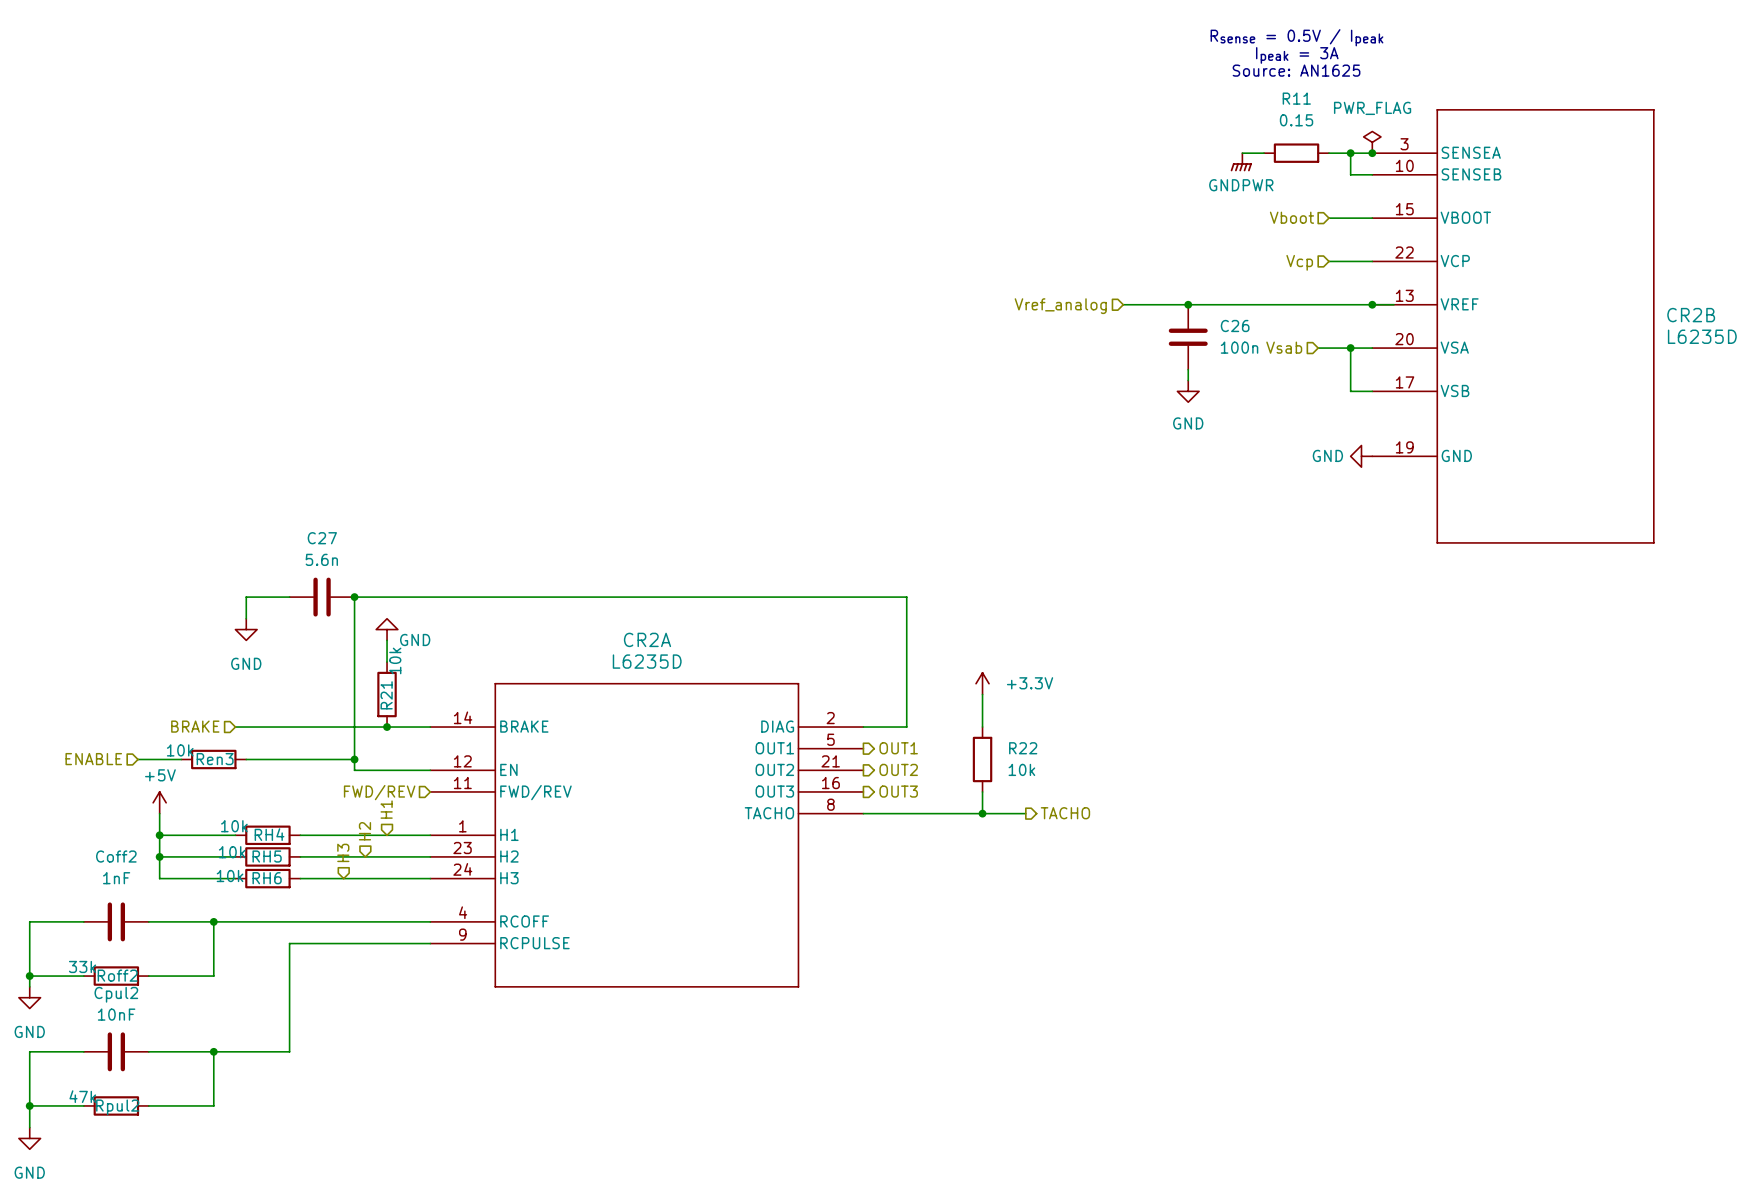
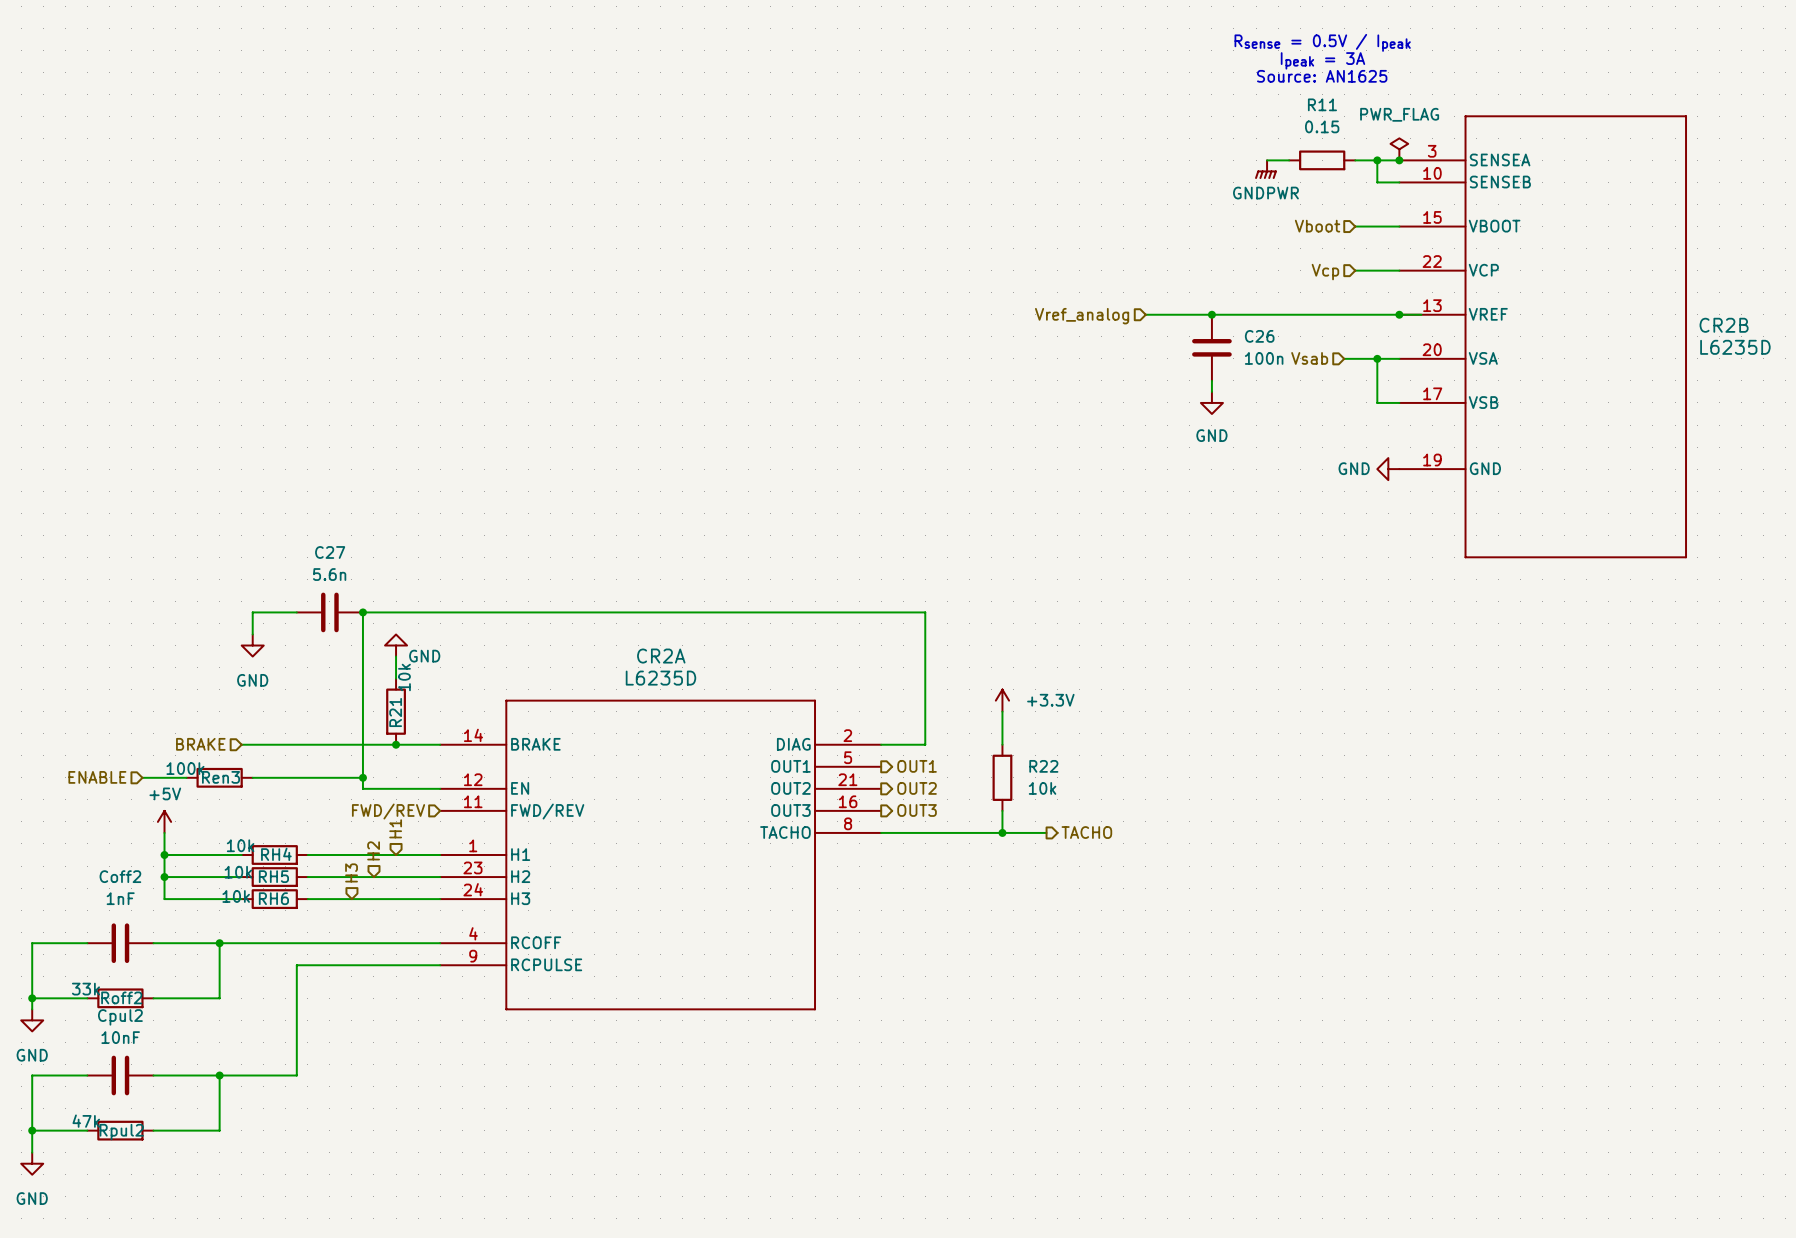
Ren3 value: 10k (180, 750) -> 100k (185, 768)

